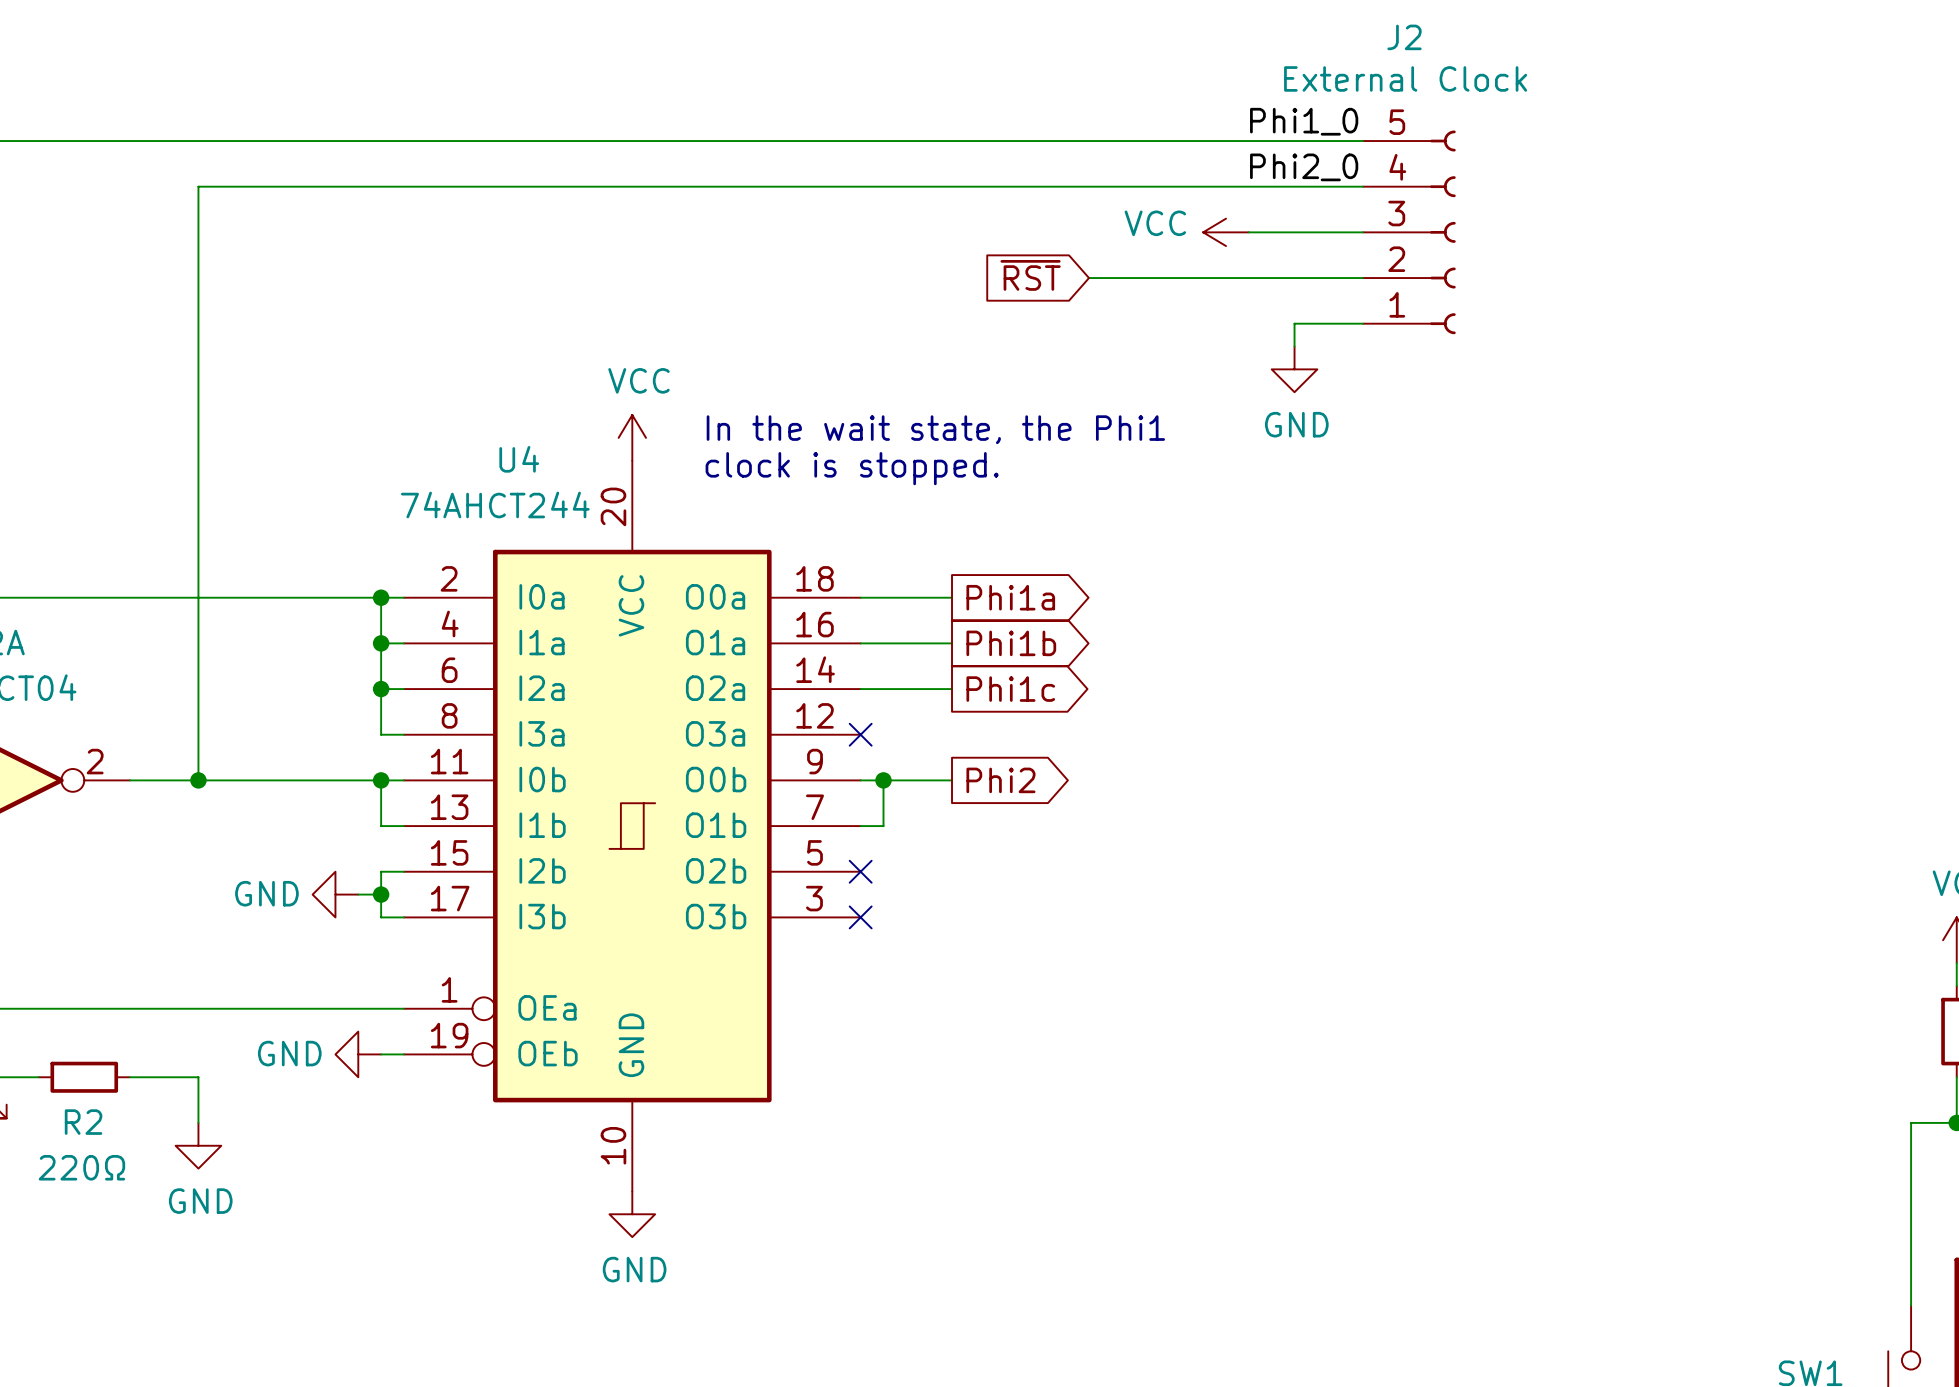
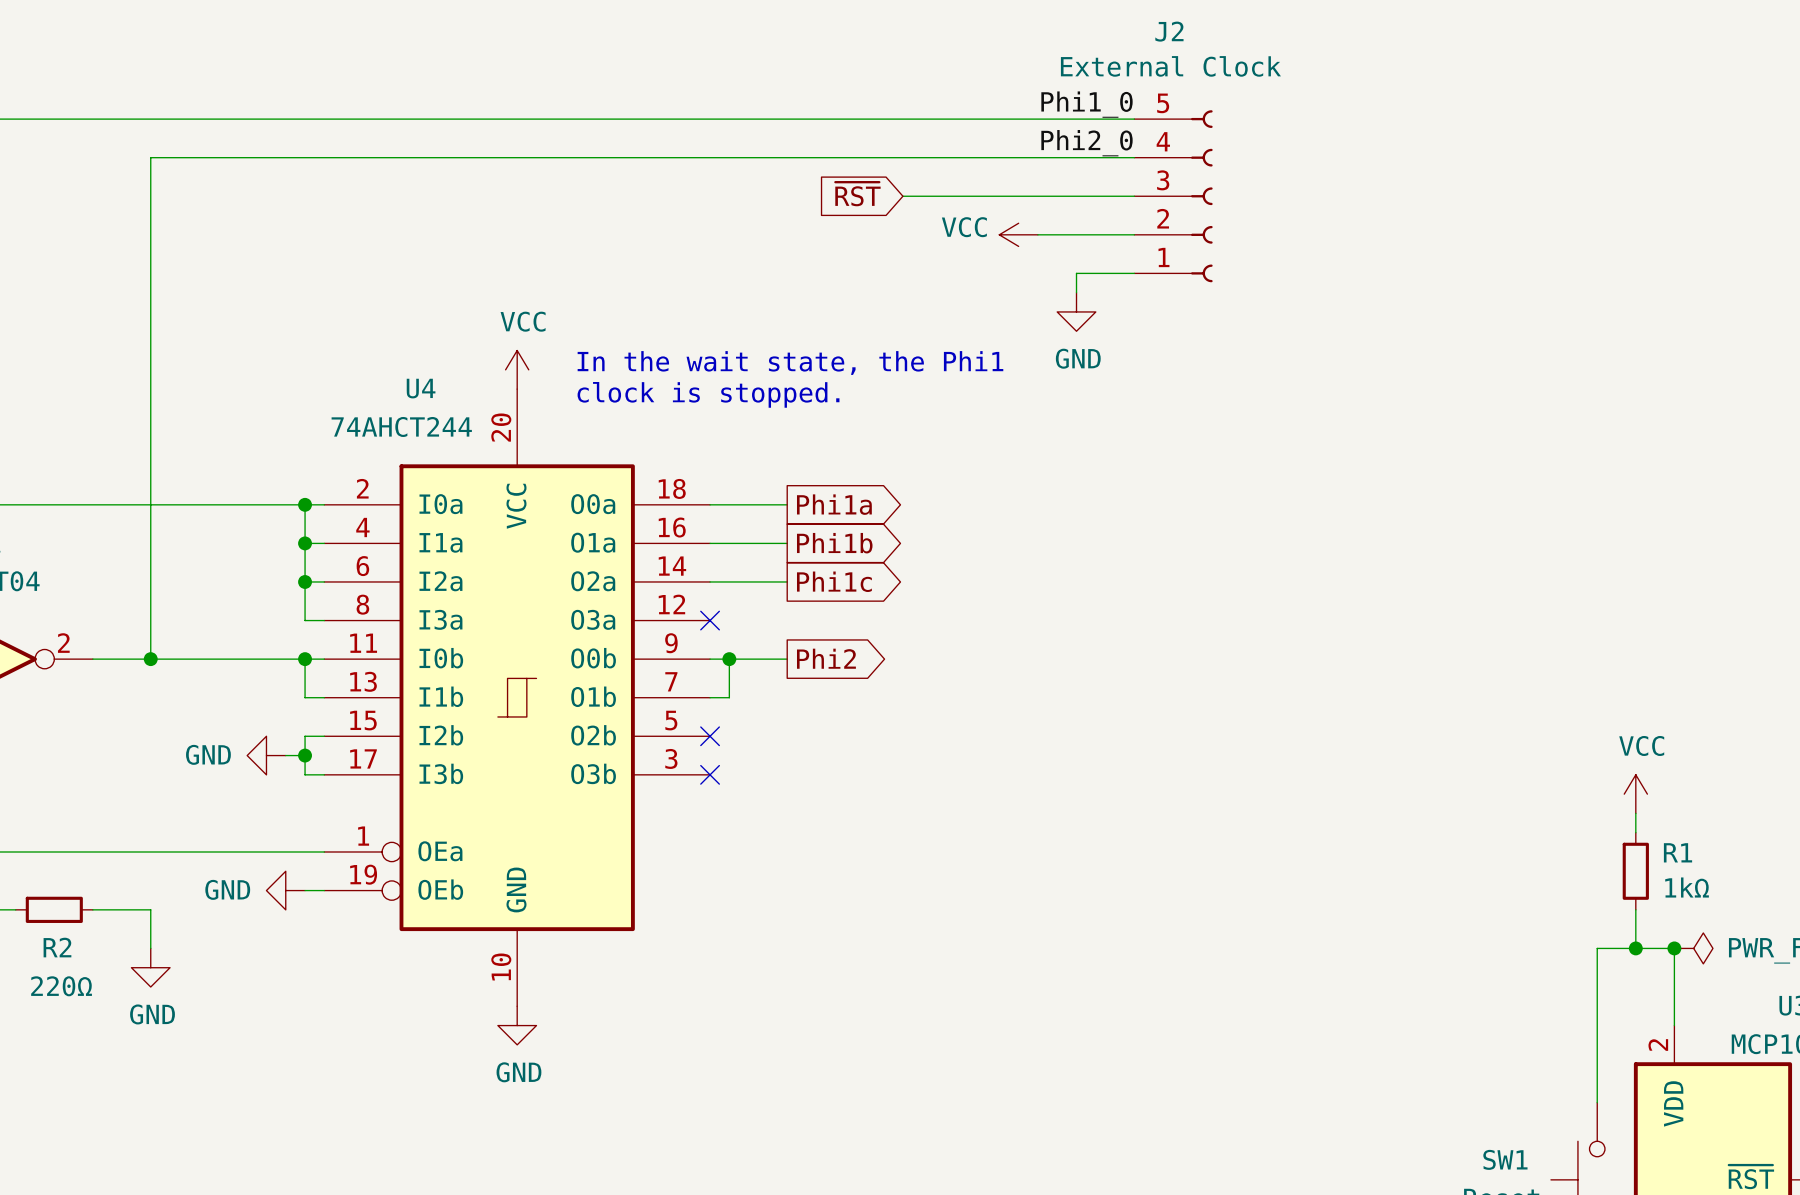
power symbol position: VCC (1226, 232) -> VCC (1018, 234)
global label position: ~{RST} (1030, 275) -> ~{RST} (857, 194)
wire: (1089, 278) (1248, 278) -> (902, 196) (1037, 196)

